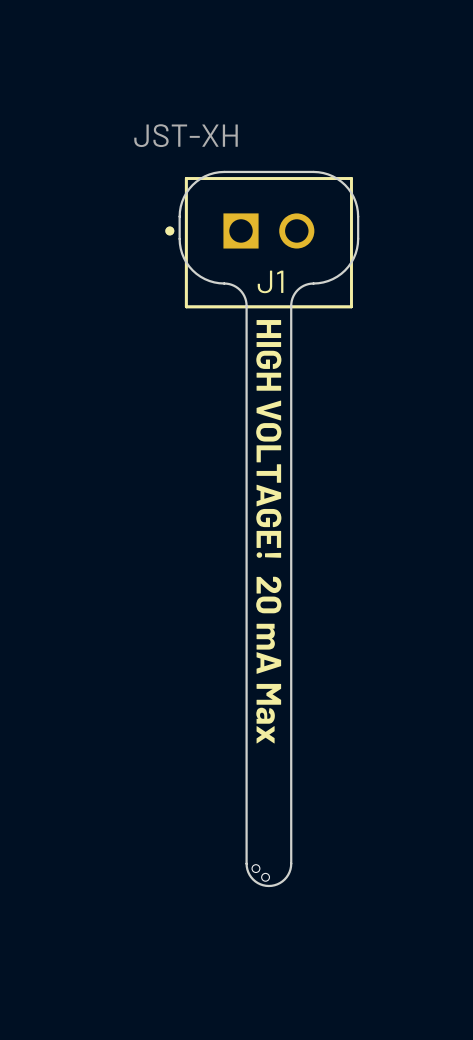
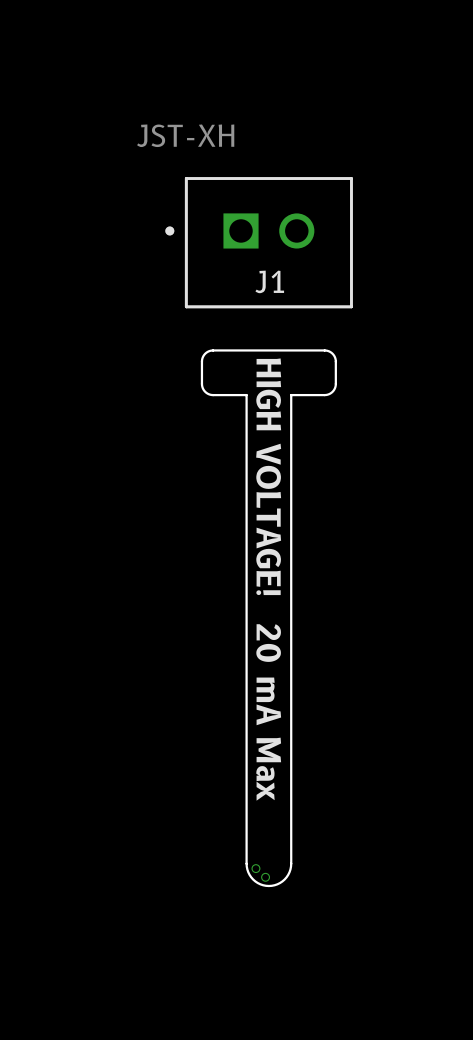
board edge: (291, 395) (292, 298) (301, 286) (332, 279) (341, 273) (351, 262) (357, 243) (358, 216) (355, 201) (345, 185) (337, 178) (323, 173) (219, 172) (209, 174) (196, 181) (184, 197) (179, 211) (179, 243) (184, 258) (196, 273) (209, 281) (233, 285) (244, 296) (246, 305) (246, 395) -> (291, 395) (326, 394) (332, 391) (335, 383) (335, 360) (332, 353) (324, 350) (213, 350) (205, 353) (201, 361) (202, 385) (205, 391) (211, 394) (246, 395)
text position: HIGH VOLTAGE! 20 mA Max (268, 531) -> HIGH VOLTAGE! 20 mA Max (268, 579)

